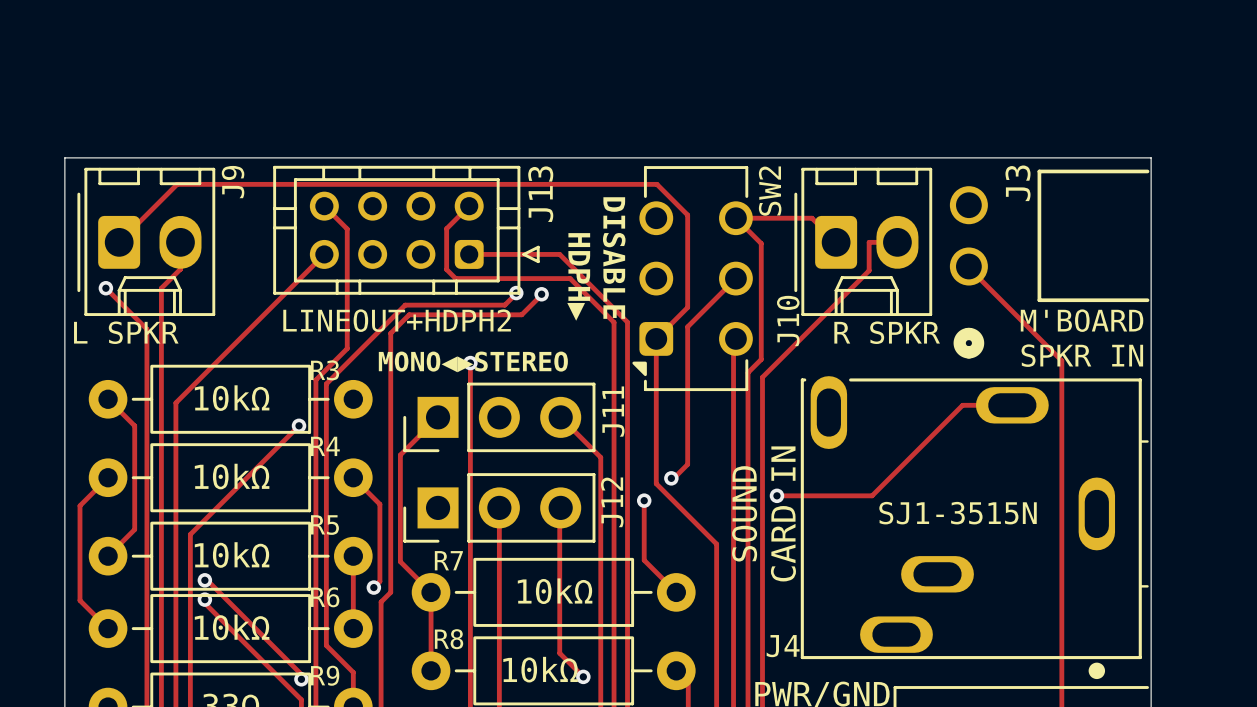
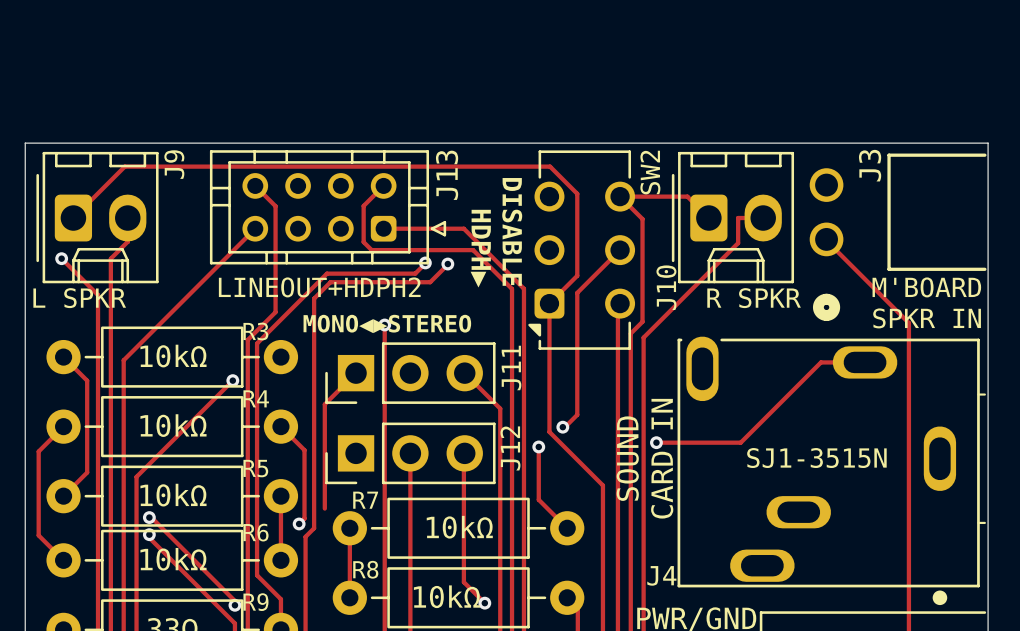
track: (402, 452) (400, 455) (400, 561) (431, 592) -> (324, 404) (324, 508)

